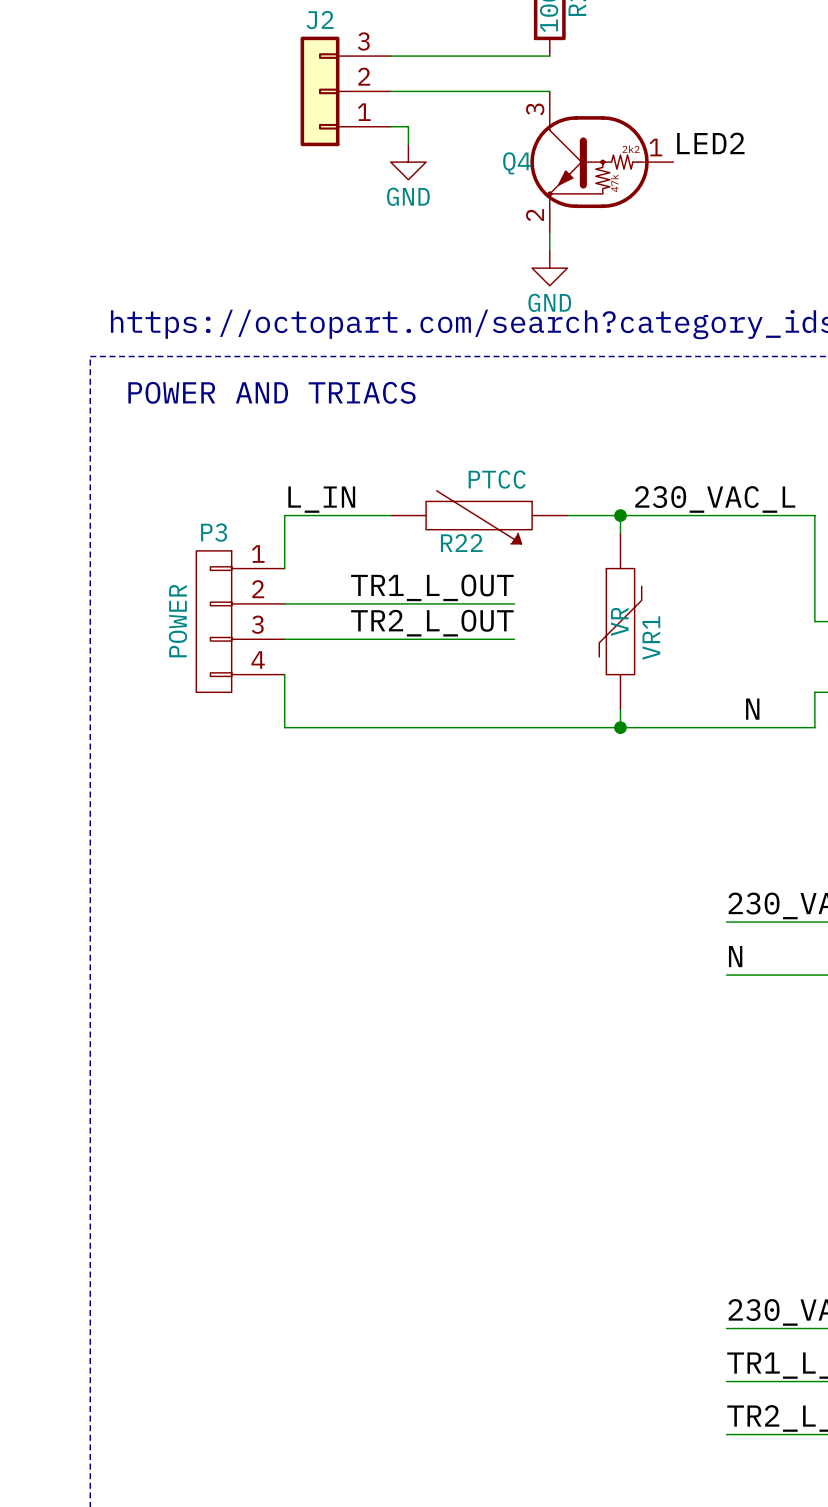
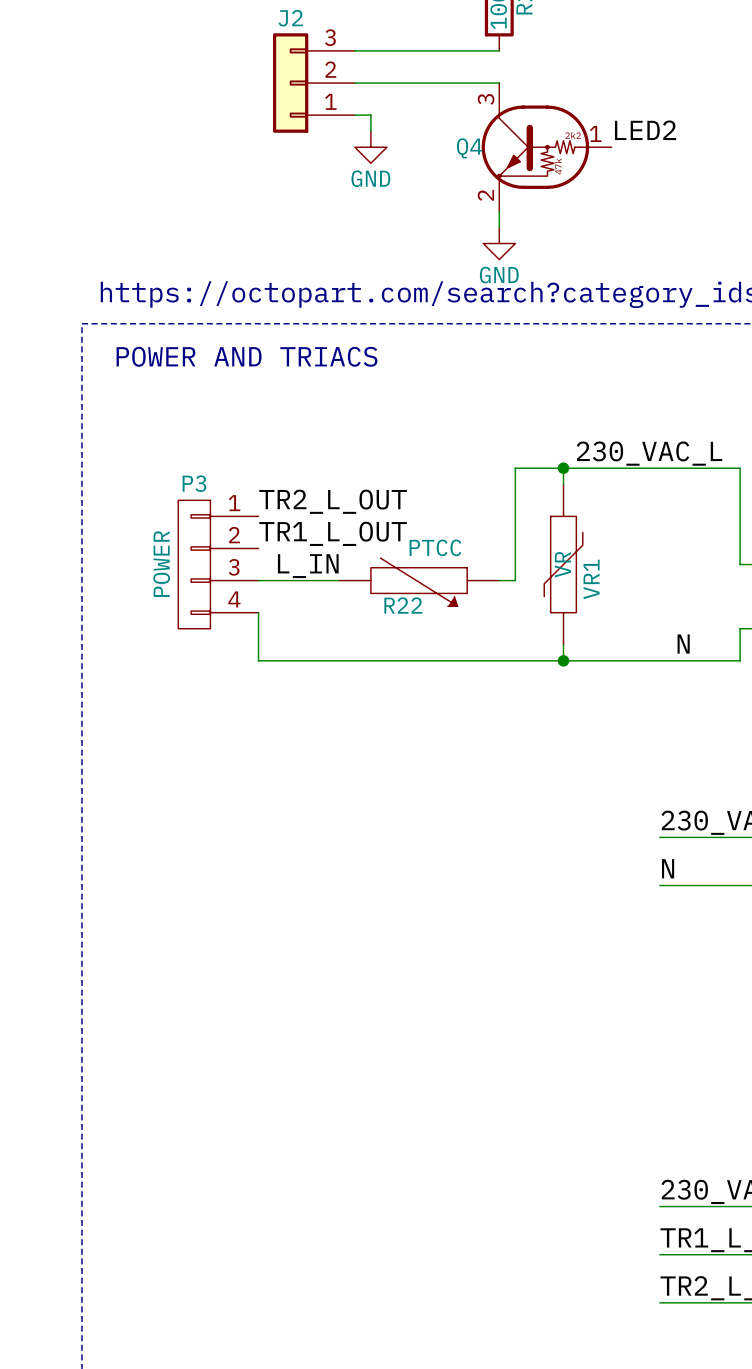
label position: L_IN (321, 499) -> L_IN (308, 566)
wire: (390, 515) (284, 515) (284, 568) -> none
wire: none -> (515, 468) (515, 580) (499, 580)
R22 position: (479, 517) -> (419, 582)
label position: TR1_L_OUT (432, 587) -> TR1_L_OUT (333, 533)
wire: (284, 603) (514, 603) -> none
label position: TR2_L_OUT (432, 623) -> TR2_L_OUT (333, 501)
wire: (373, 639) (514, 639) -> none

